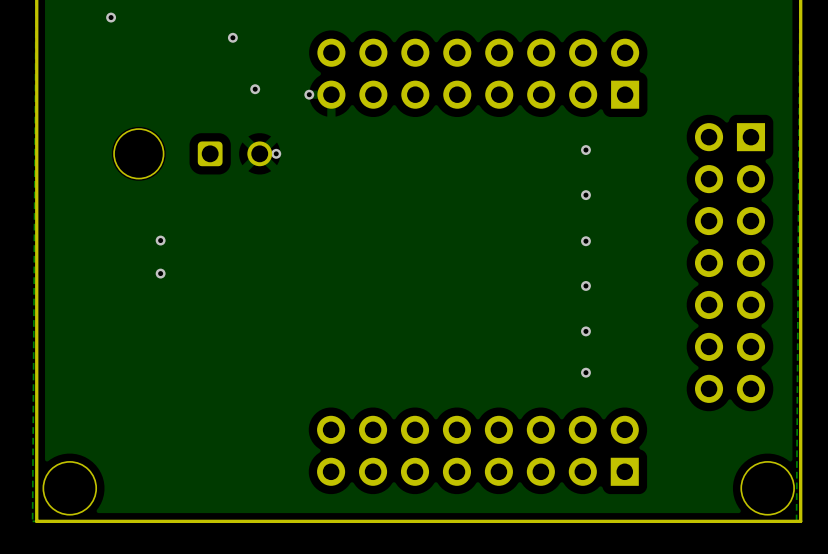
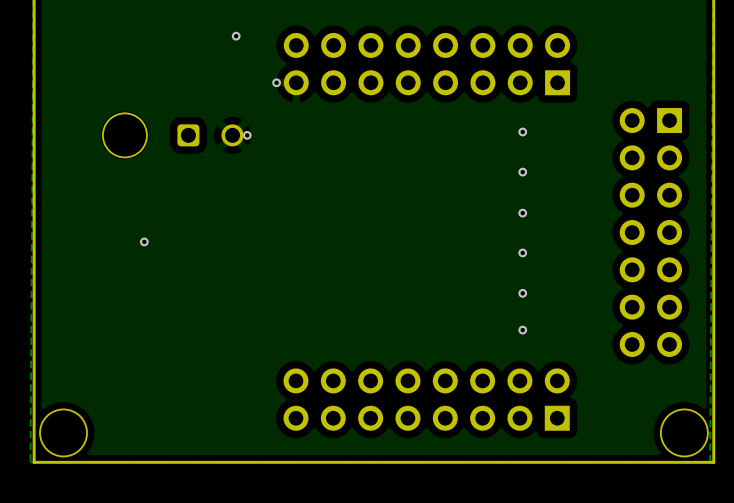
via: (111, 17) -> none
via: (232, 37) -> none
via: none -> (236, 36)
via: (255, 89) -> none
via: (160, 240) -> none

